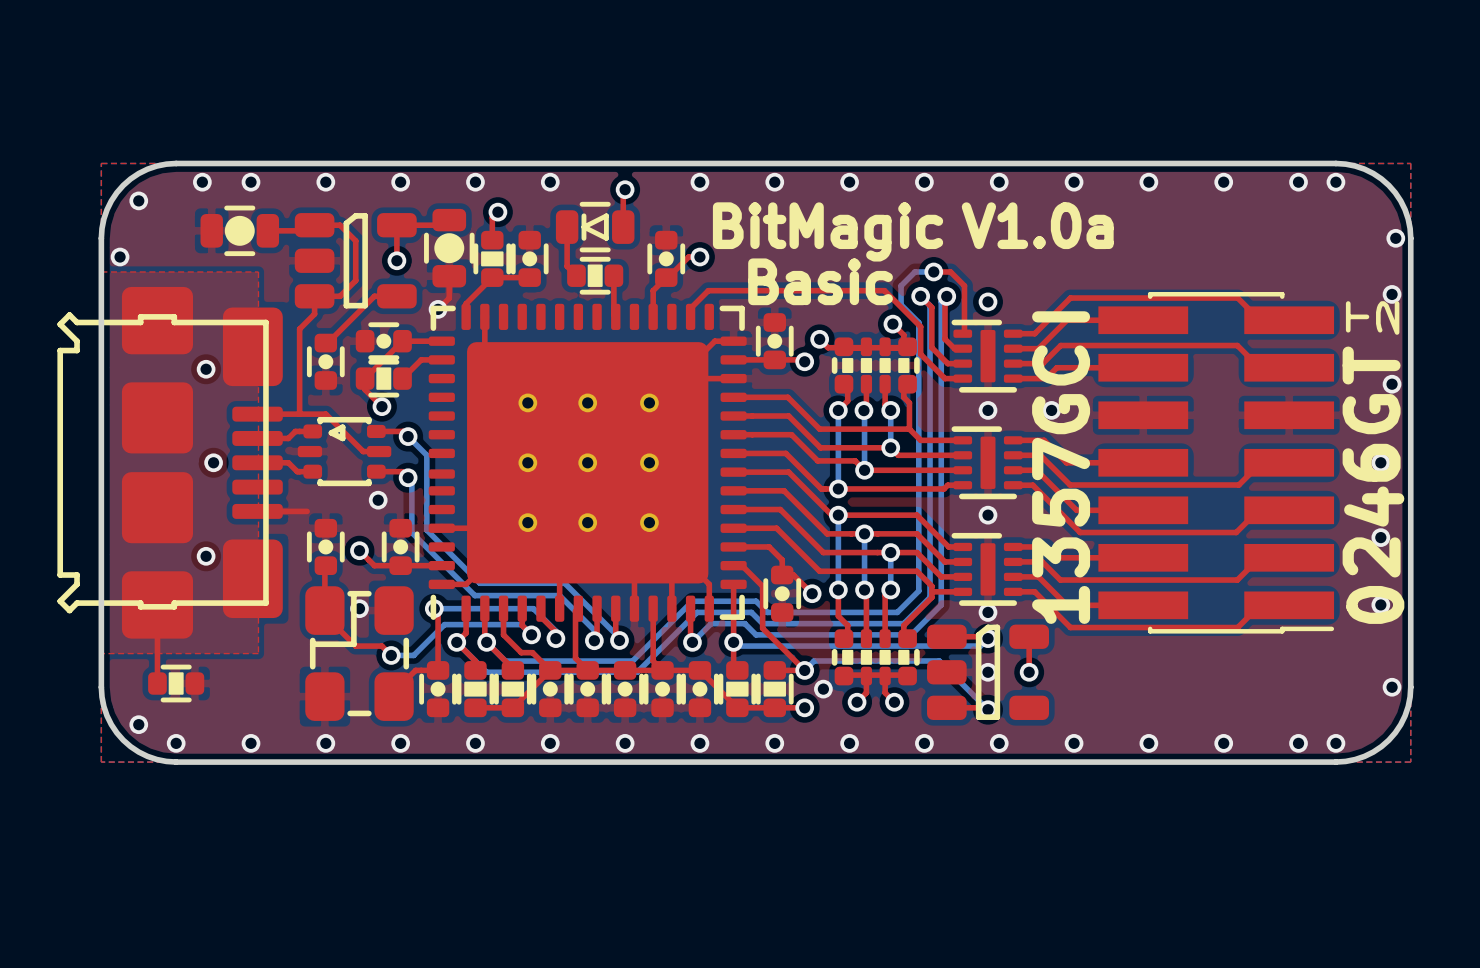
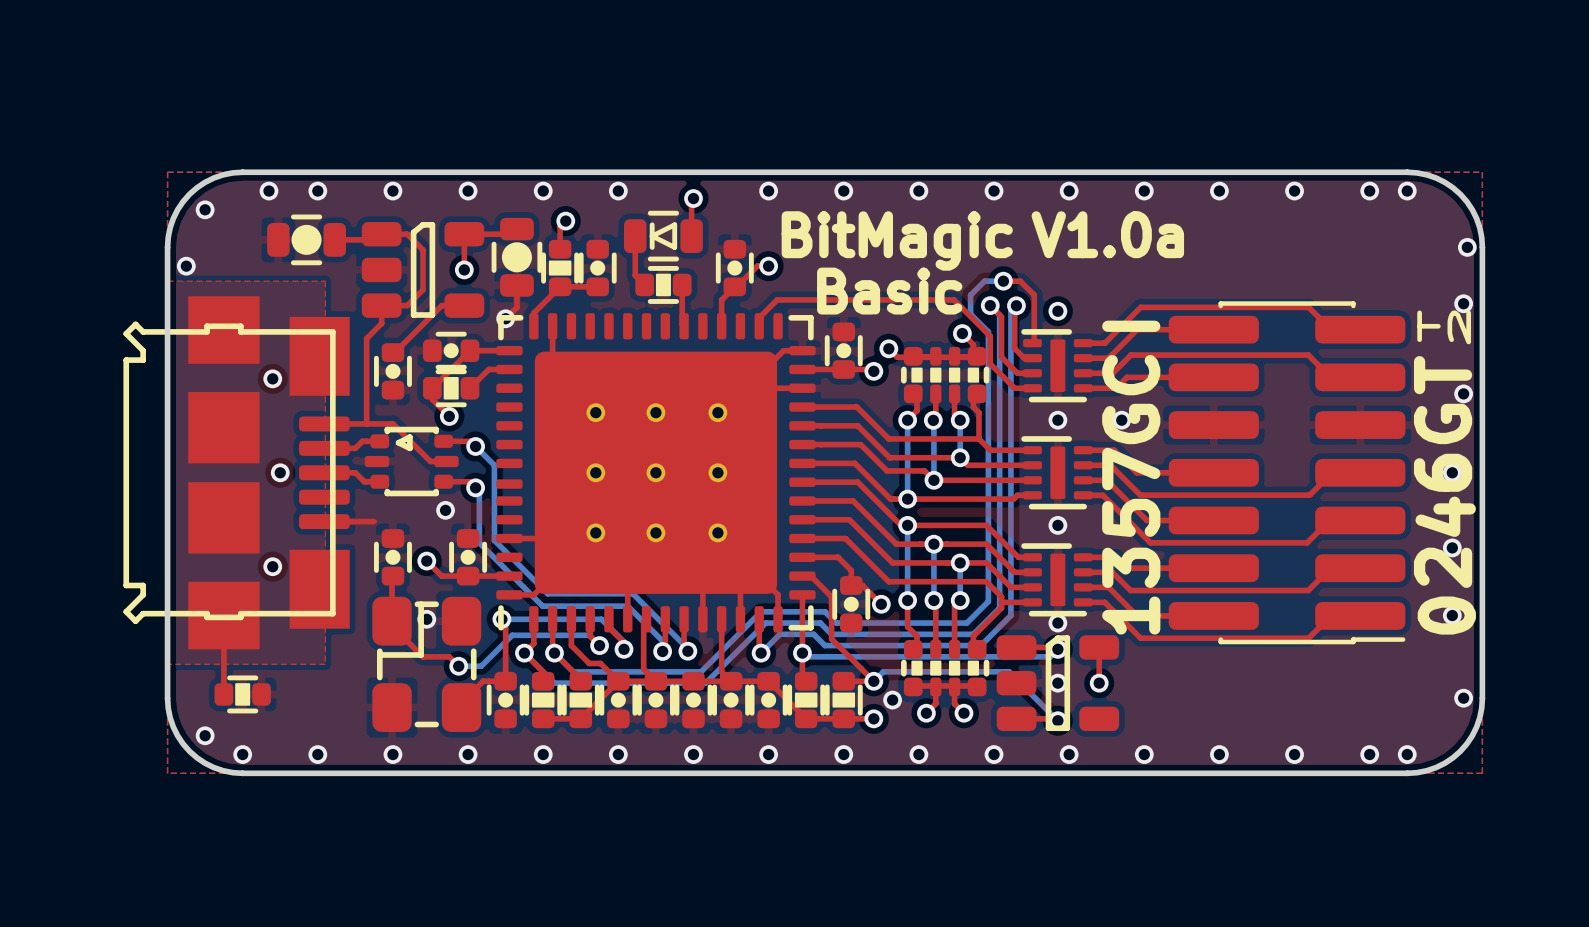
part footprint: [57, 286, 283, 639] -> [123, 296, 350, 650]
part footprint: [1098, 292, 1335, 634] -> [1168, 301, 1406, 645]

